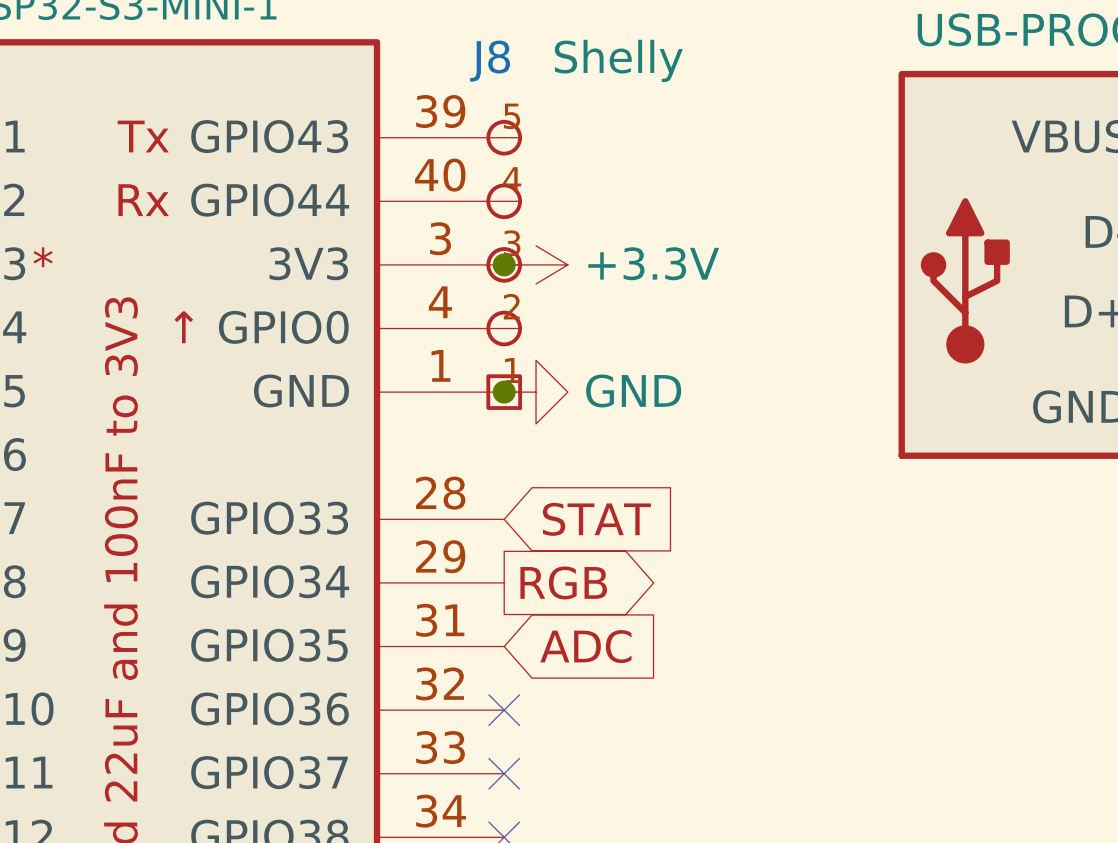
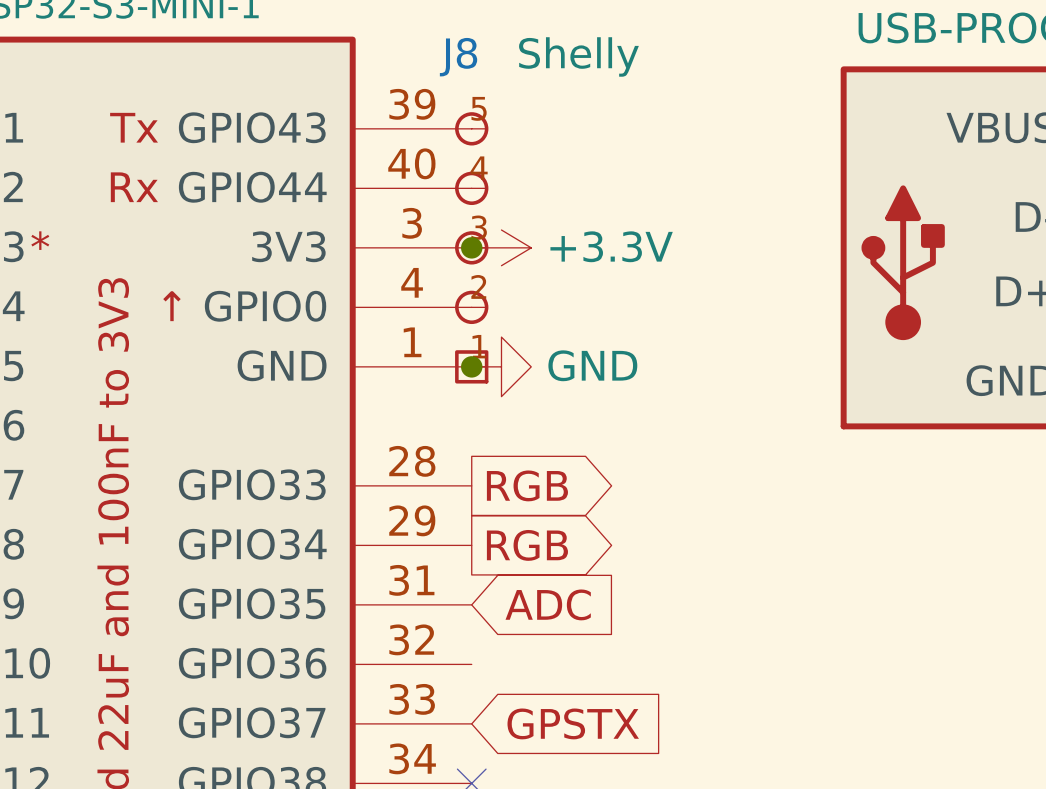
global label shape: input (596, 519) -> output (527, 485)
global label: STAT (596, 519) -> RGB (527, 485)
no-connect mark: (504, 710) -> none
no-connect mark: (504, 773) -> none
global label: none -> GPSTX (573, 723)

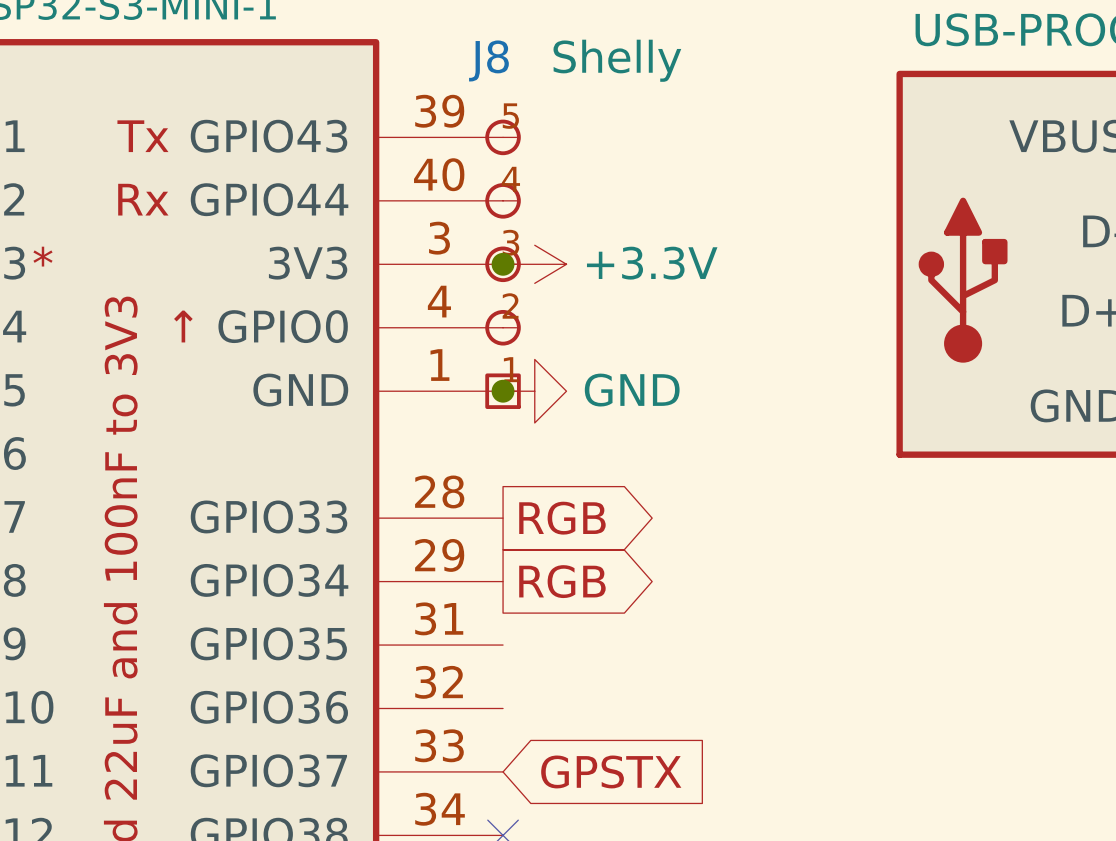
global label: ADC (548, 604) -> none

